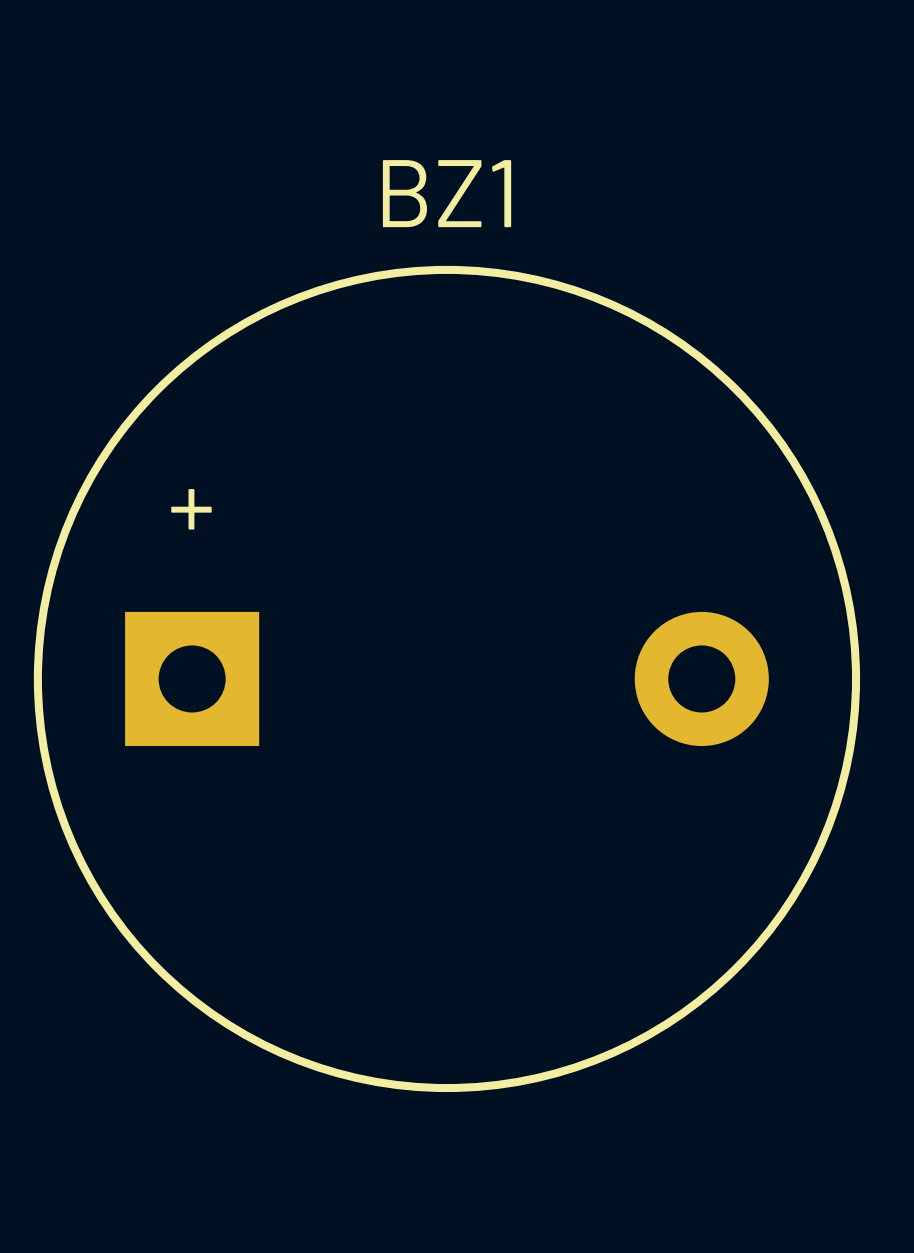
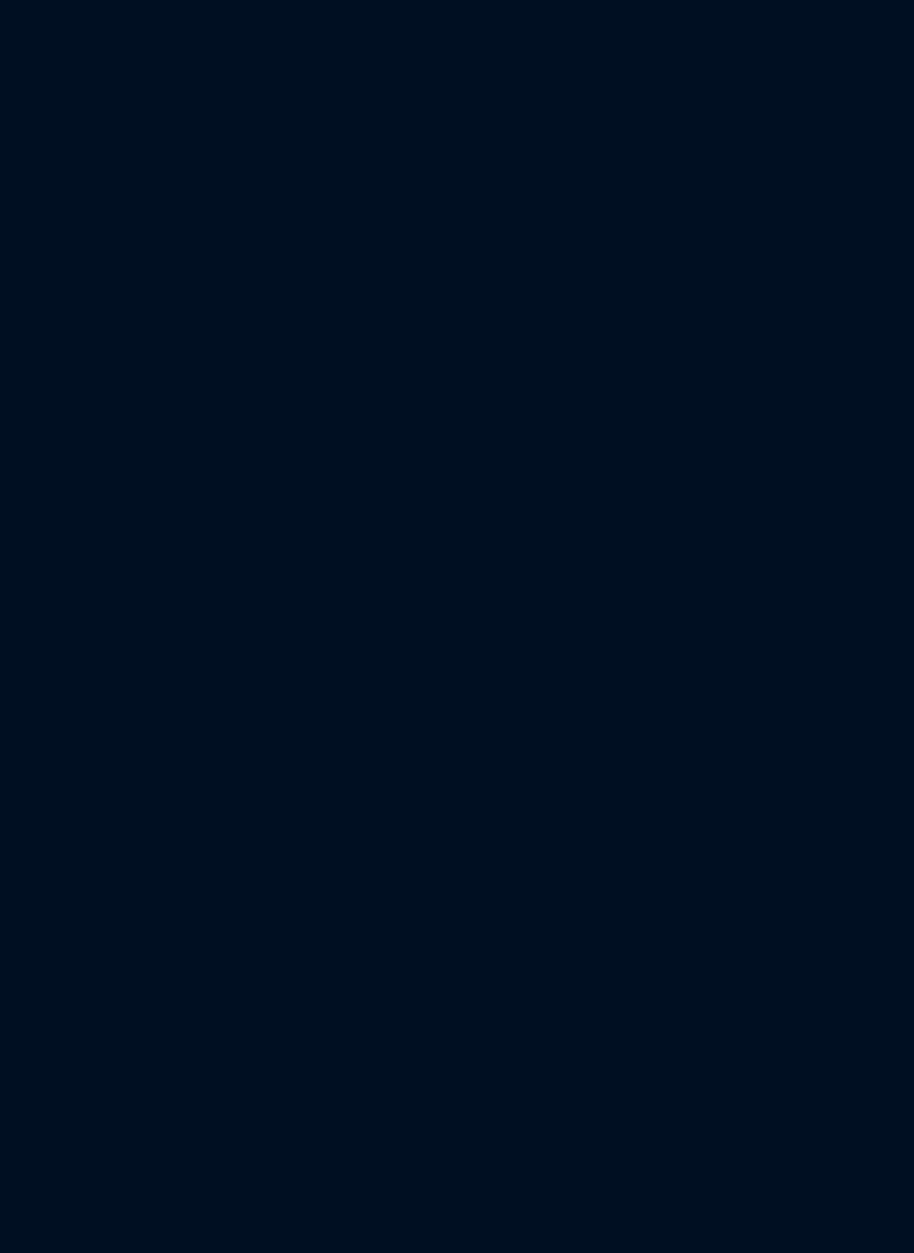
BZ1: (446, 678) -> none

